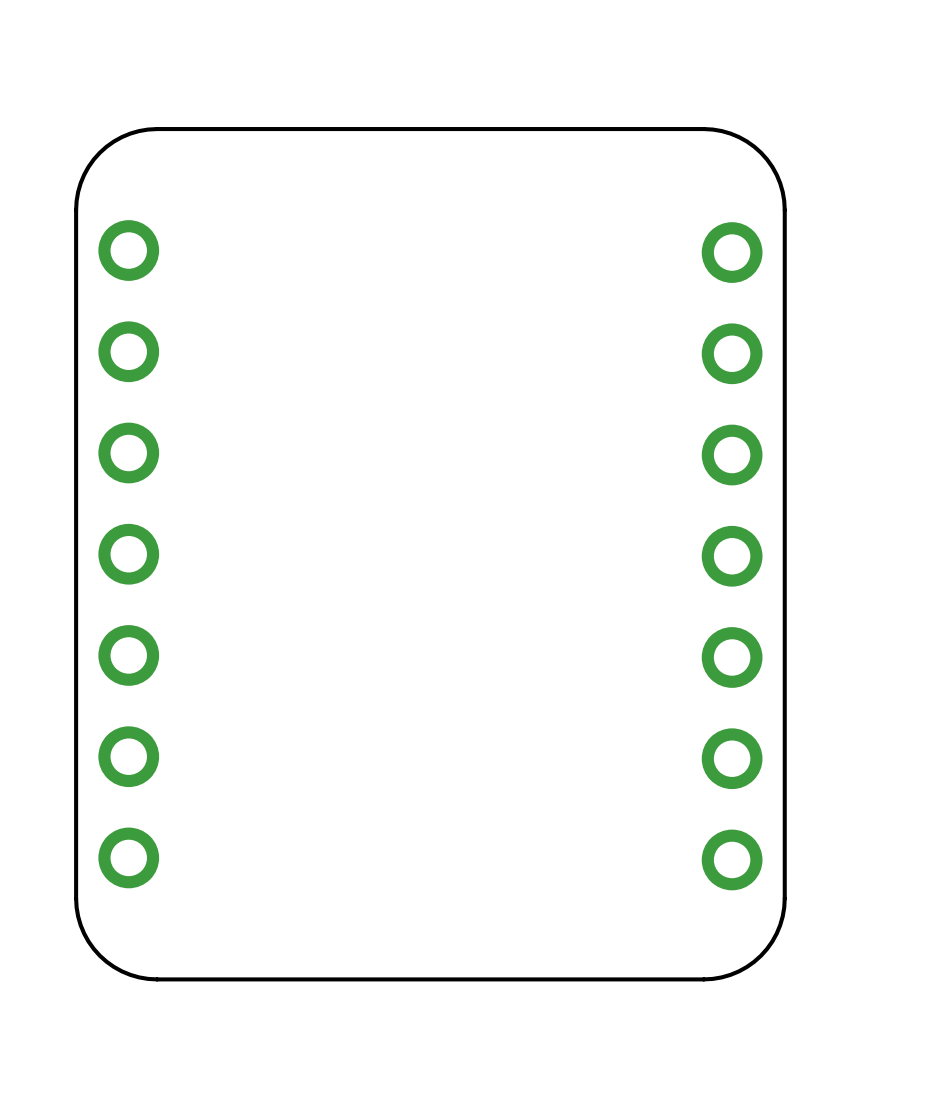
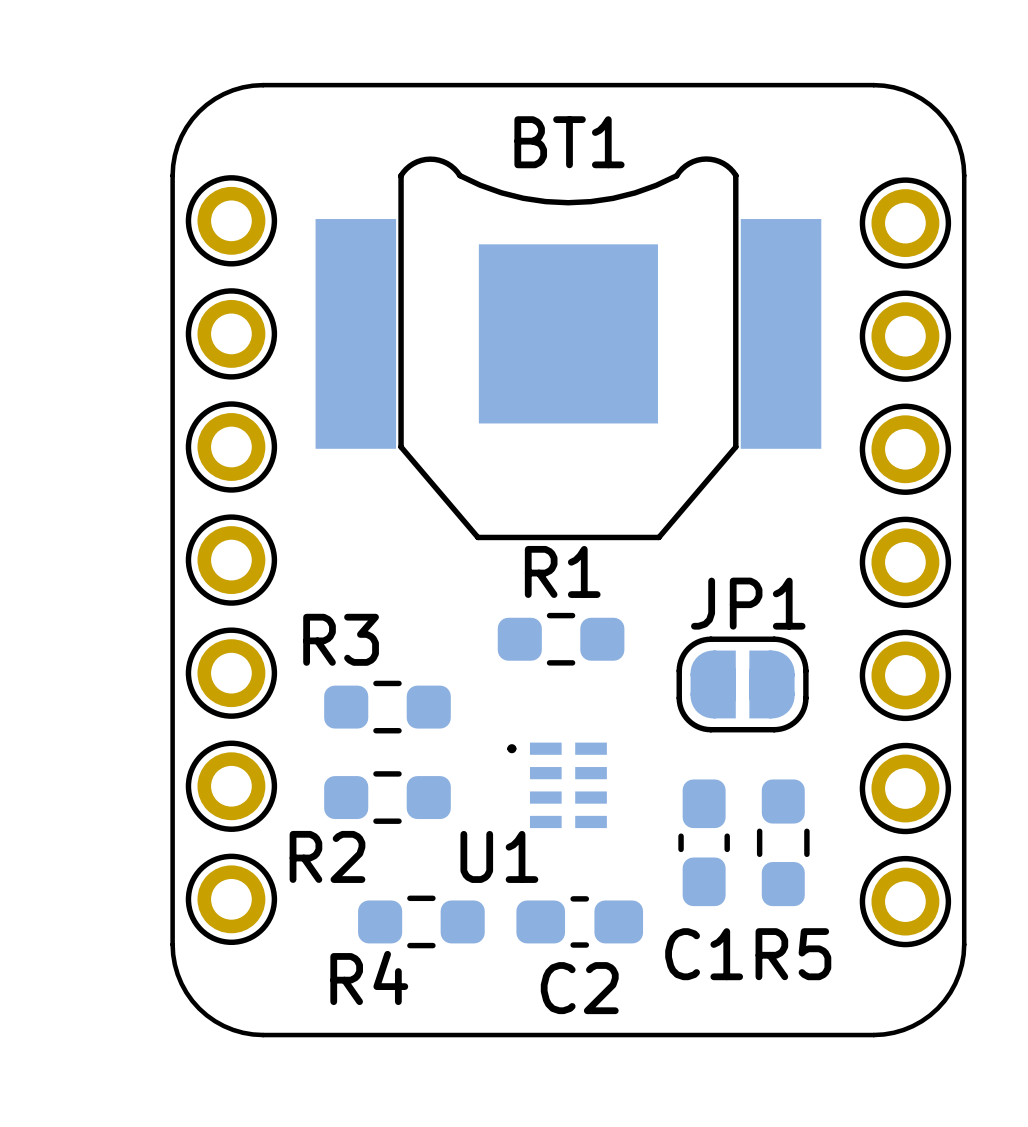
part side: top (128, 250) -> bottom (231, 220)
part side: top (732, 252) -> bottom (905, 223)
part side: top (128, 351) -> bottom (231, 333)
part side: top (732, 353) -> bottom (905, 336)
BT1: none -> (568, 348)
part side: top (128, 452) -> bottom (231, 446)
part side: top (732, 455) -> bottom (905, 449)
part side: top (128, 554) -> bottom (231, 560)
part side: top (732, 556) -> bottom (905, 562)
R1: none -> (561, 639)
part side: top (128, 655) -> bottom (231, 673)
part side: top (732, 657) -> bottom (905, 675)
JP1: none -> (742, 684)
R3: none -> (387, 707)
U1: none -> (557, 785)
part side: top (128, 756) -> bottom (231, 786)
part side: top (732, 758) -> bottom (905, 788)
R2: none -> (387, 797)
C1: none -> (704, 842)
R5: none -> (783, 842)
part side: top (128, 857) -> bottom (231, 899)
part side: top (732, 859) -> bottom (905, 901)
R4: none -> (421, 921)
C2: none -> (579, 921)

